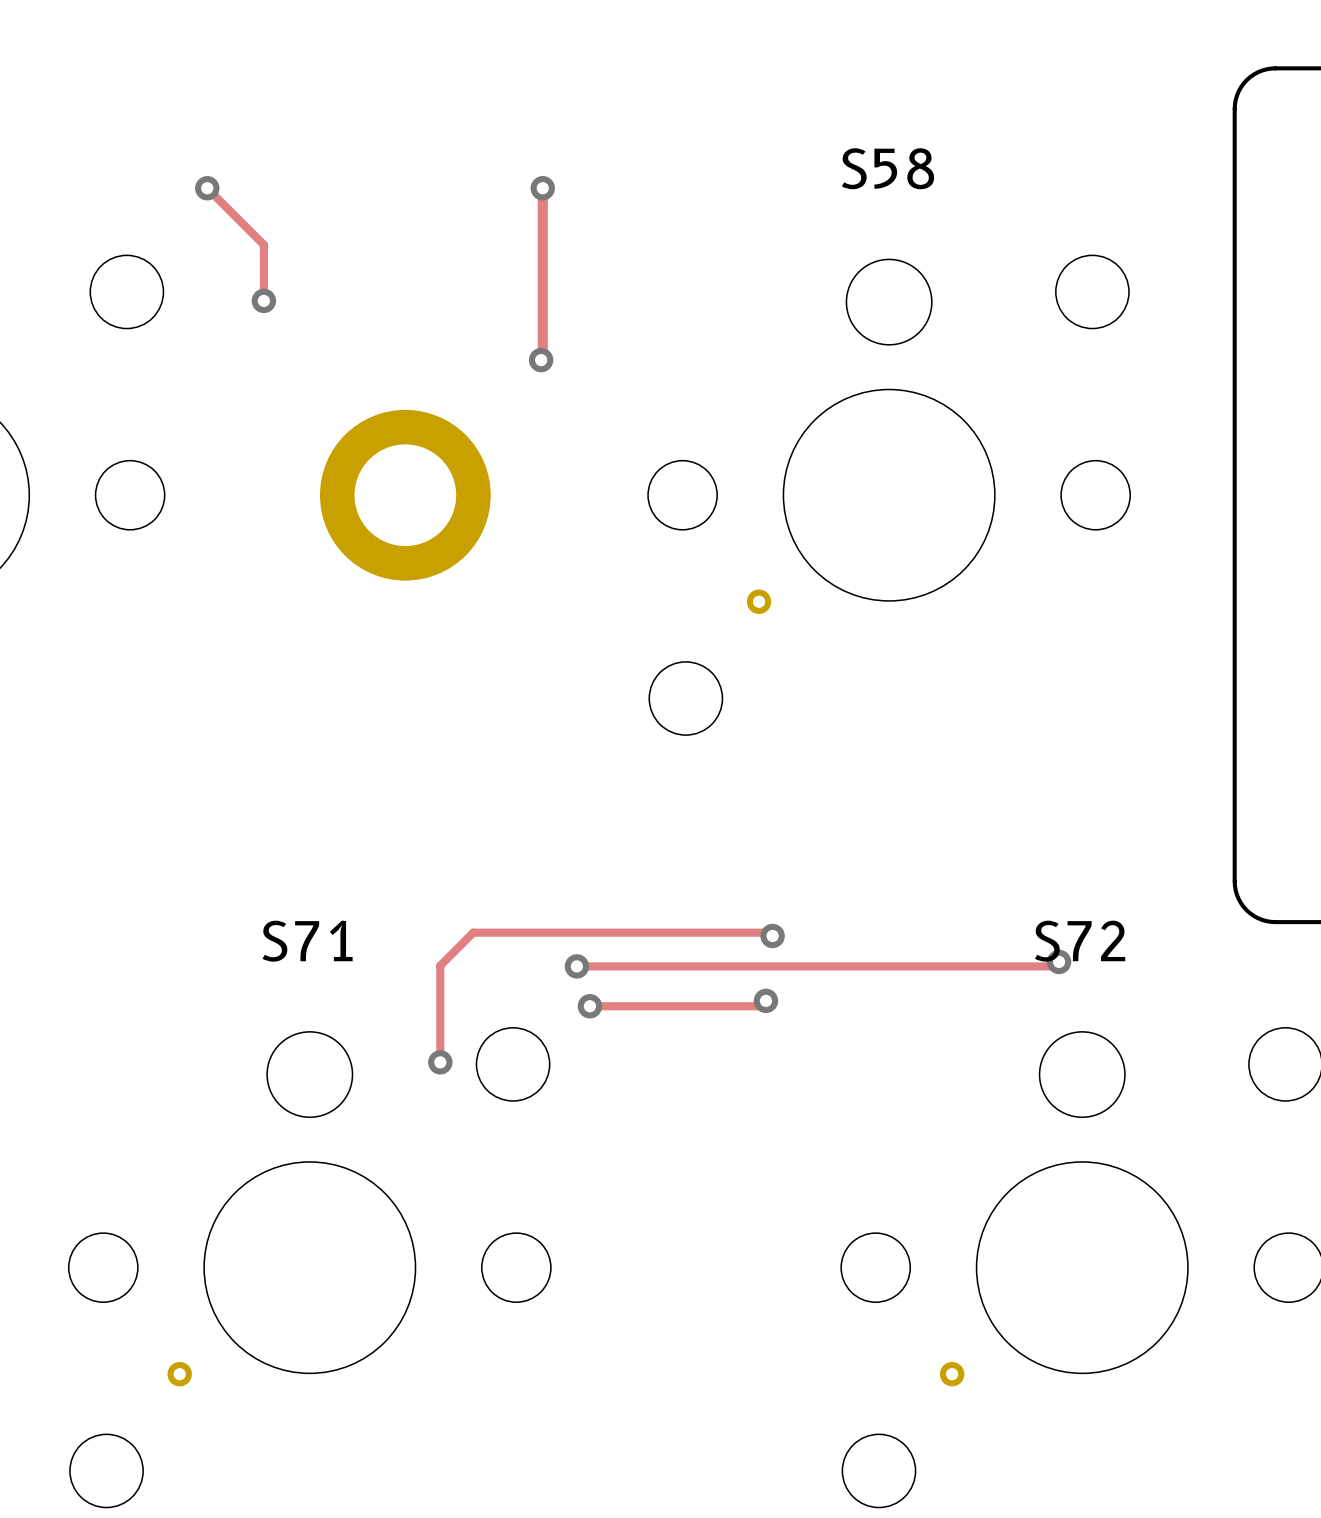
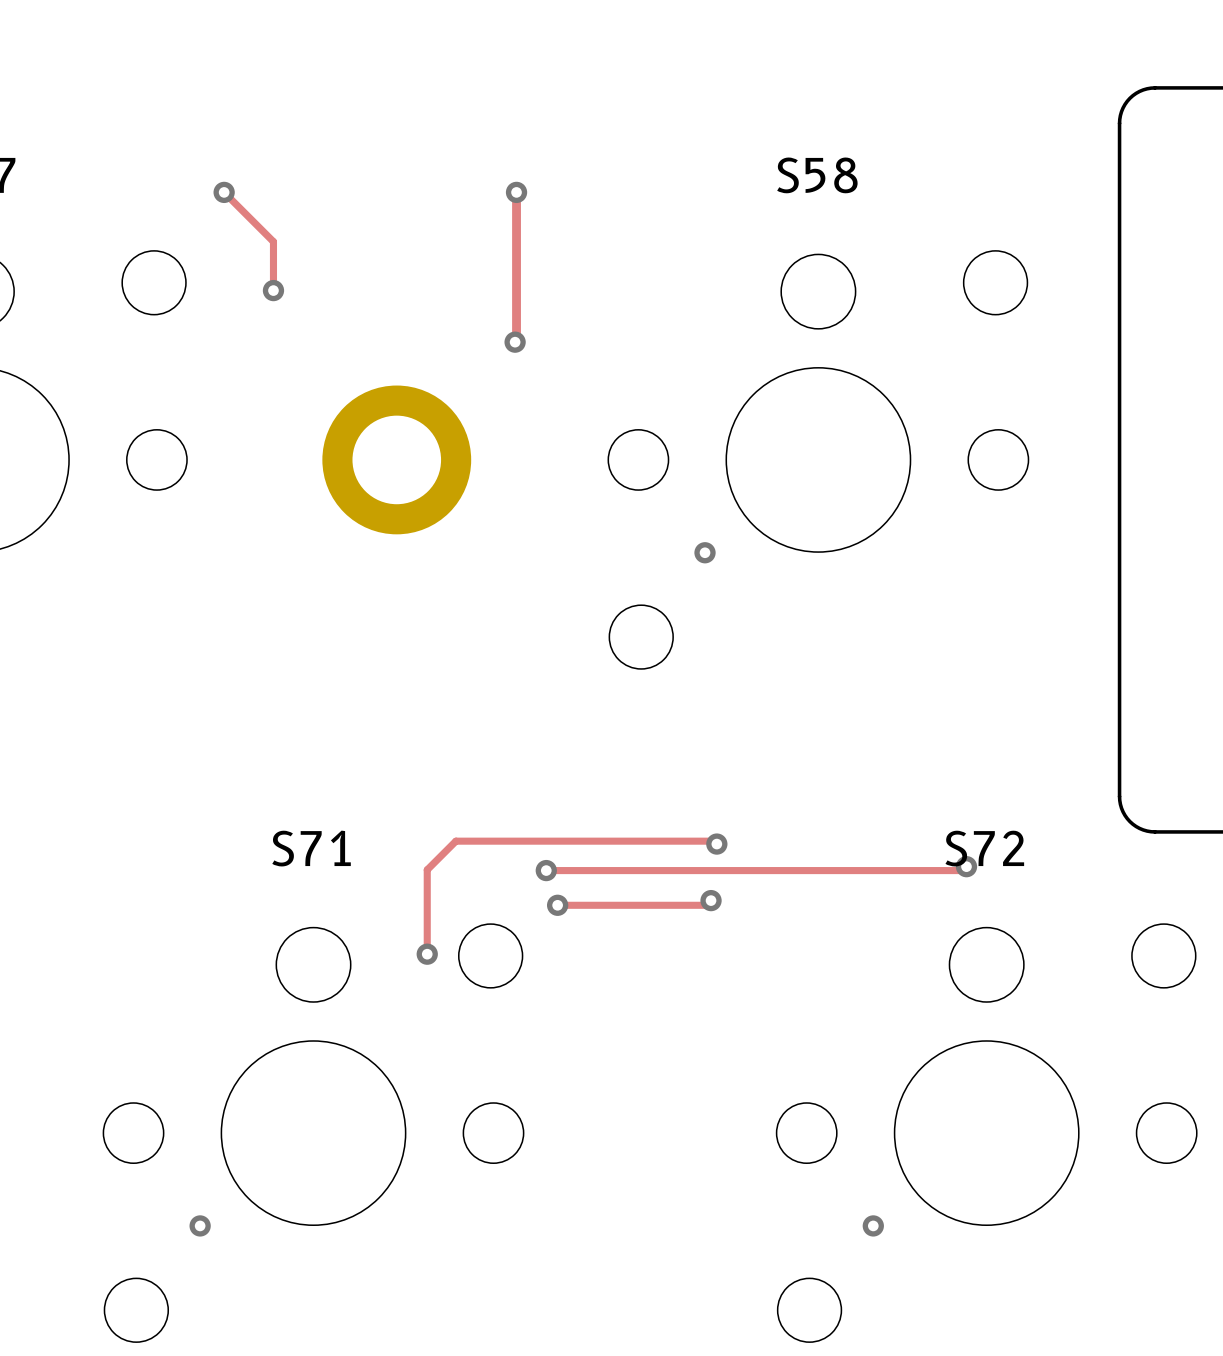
part: (759, 601) -> none
via: none -> (705, 552)
part: (179, 1374) -> none
via: none -> (200, 1225)
part: (952, 1374) -> none
via: none -> (873, 1225)

